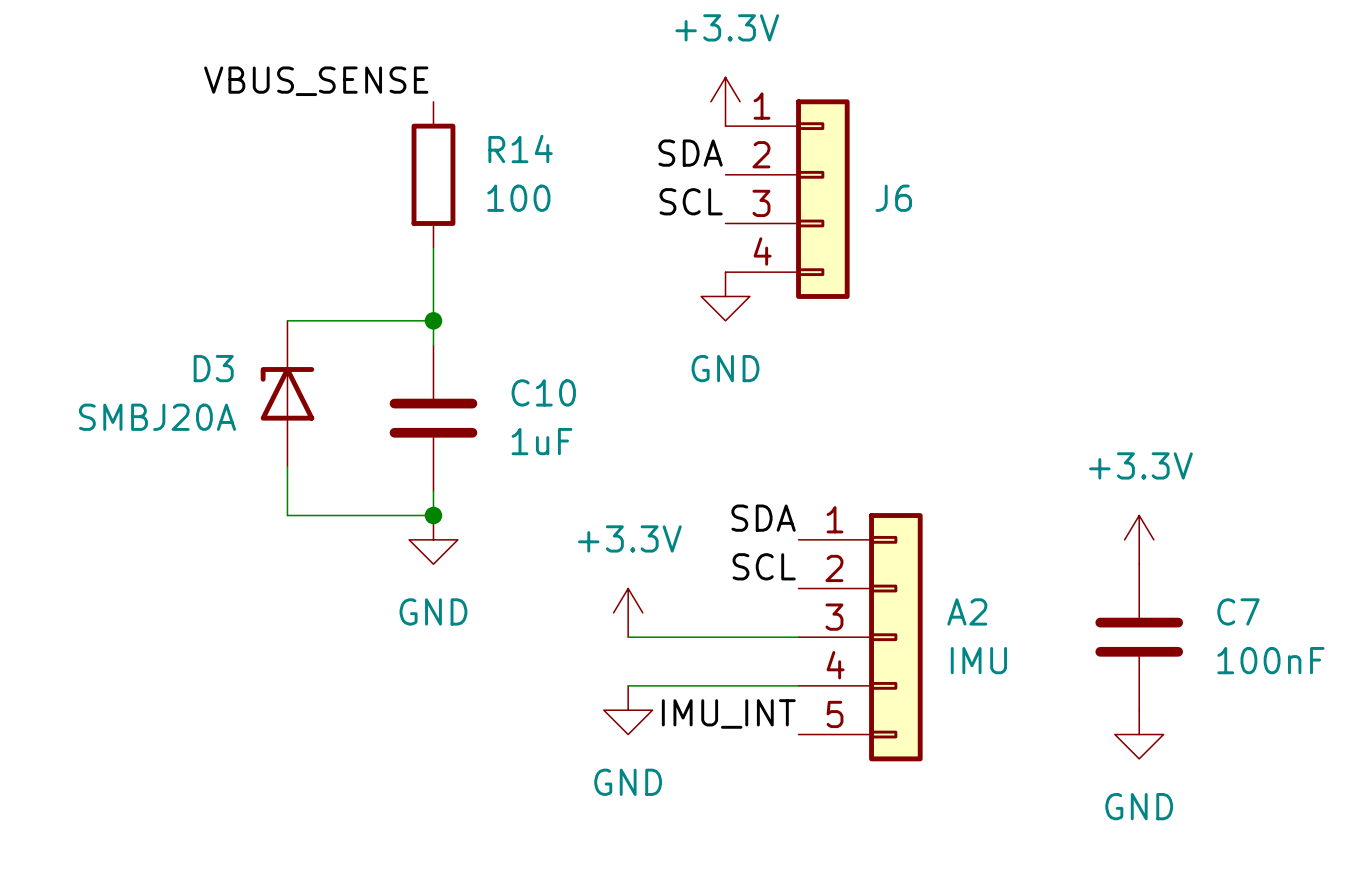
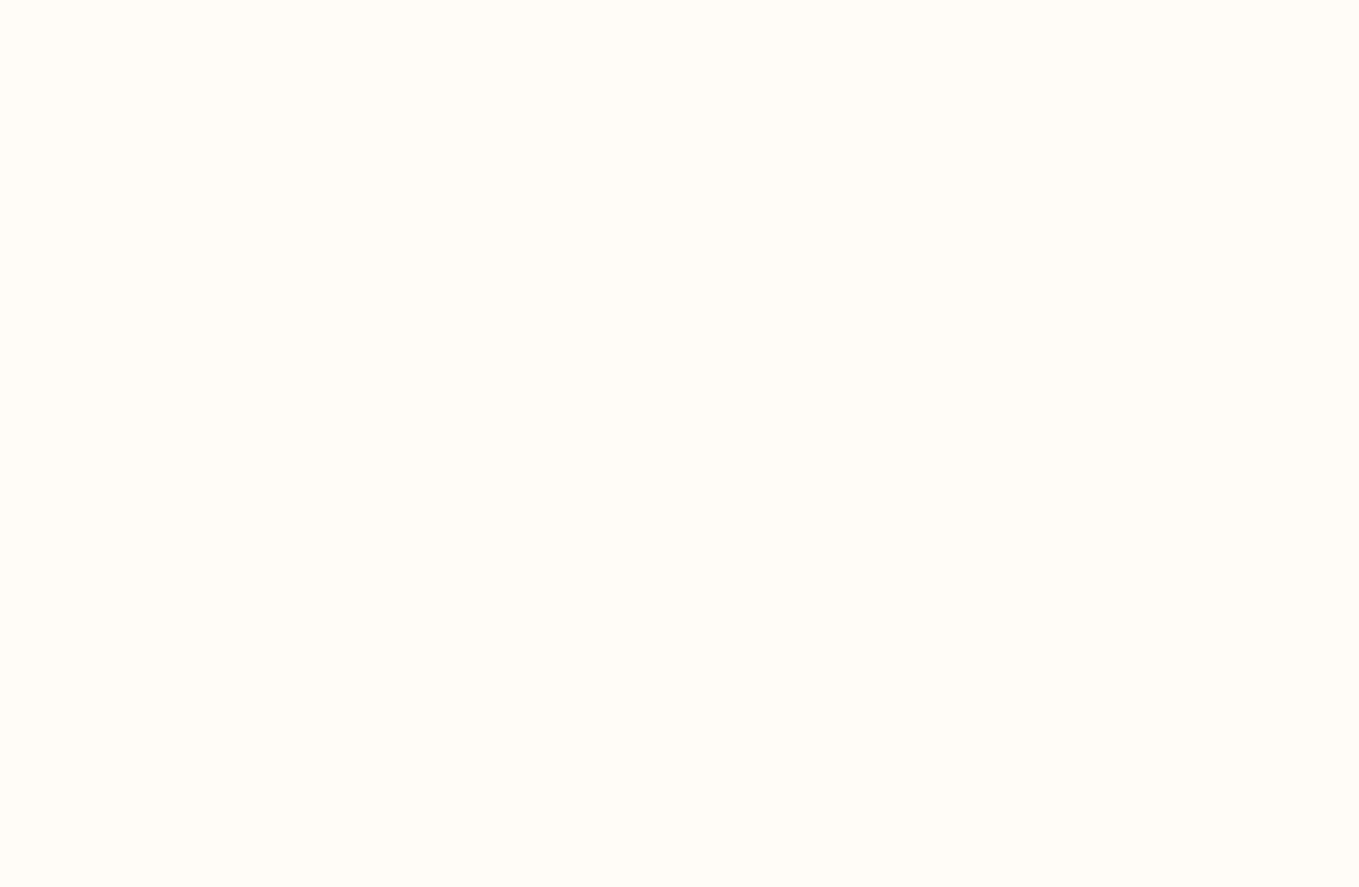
label: VBUS_SENSE (316, 81) -> none
power symbol: +3.3V (725, 101) -> none
label: SDA (690, 153) -> none
R14: 100 (433, 174) -> none
J6: (787, 199) -> none
label: SCL (691, 201) -> none
wire: (433, 247) (433, 345) -> none
power symbol: GND (725, 296) -> none
wire: (287, 320) (433, 320) -> none
junction: (433, 320) -> none
D3: SMBJ20A (287, 393) -> none
C10: 1uF (433, 418) -> none
wire: (287, 466) (287, 515) (433, 515) (433, 491) -> none
junction: (433, 515) -> none
label: SDA (763, 518) -> none
power symbol: GND (433, 539) -> none
power symbol: +3.3V (1139, 539) -> none
label: SCL (764, 566) -> none
power symbol: +3.3V (628, 612) -> none
wire: (628, 637) (798, 637) -> none
A2: IMU (860, 637) -> none
C7: 100nF (1139, 637) -> none
wire: (628, 685) (798, 685) -> none
power symbol: GND (628, 710) -> none
label: IMU_INT (728, 713) -> none
power symbol: GND (1139, 734) -> none

